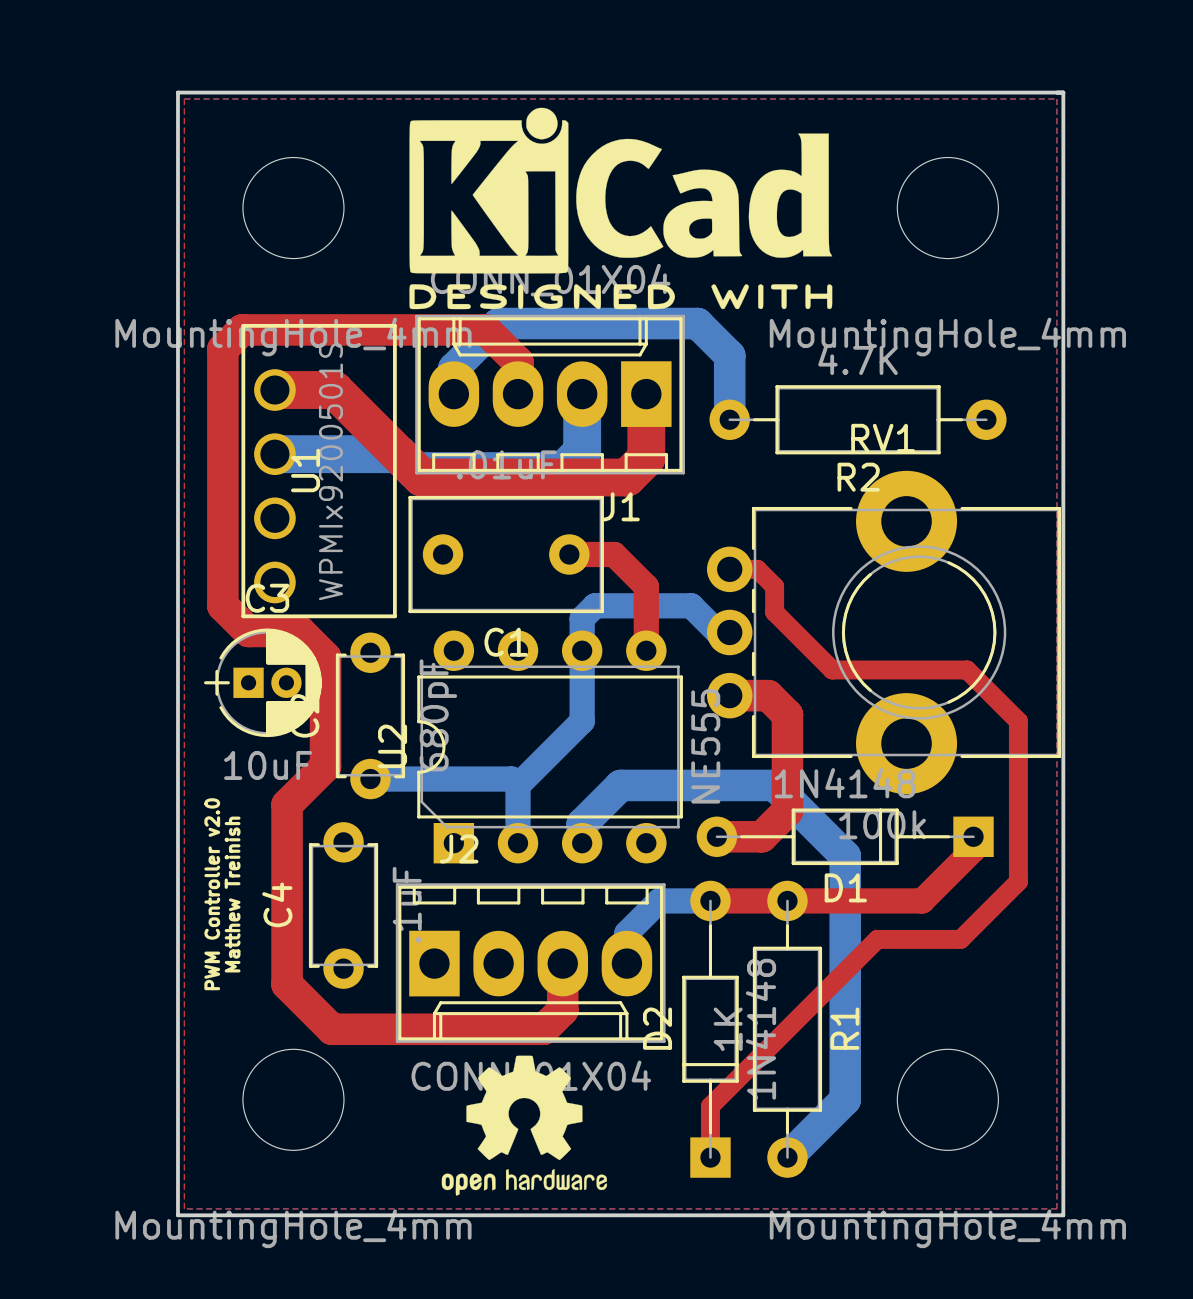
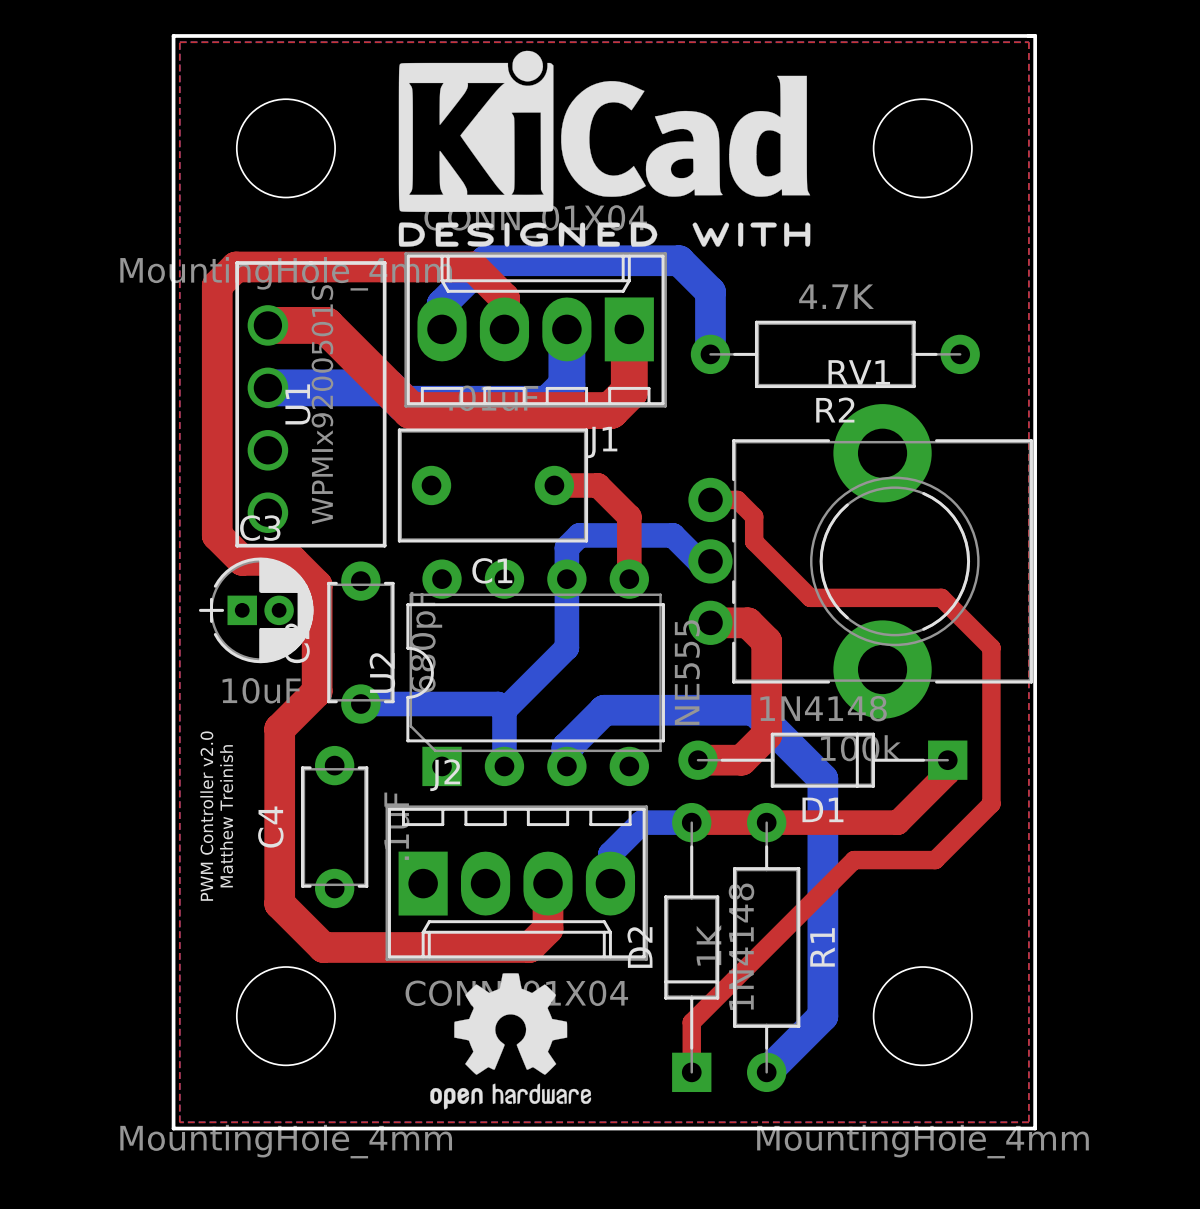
part value: MountingHole_4mm (947, 337) -> none

